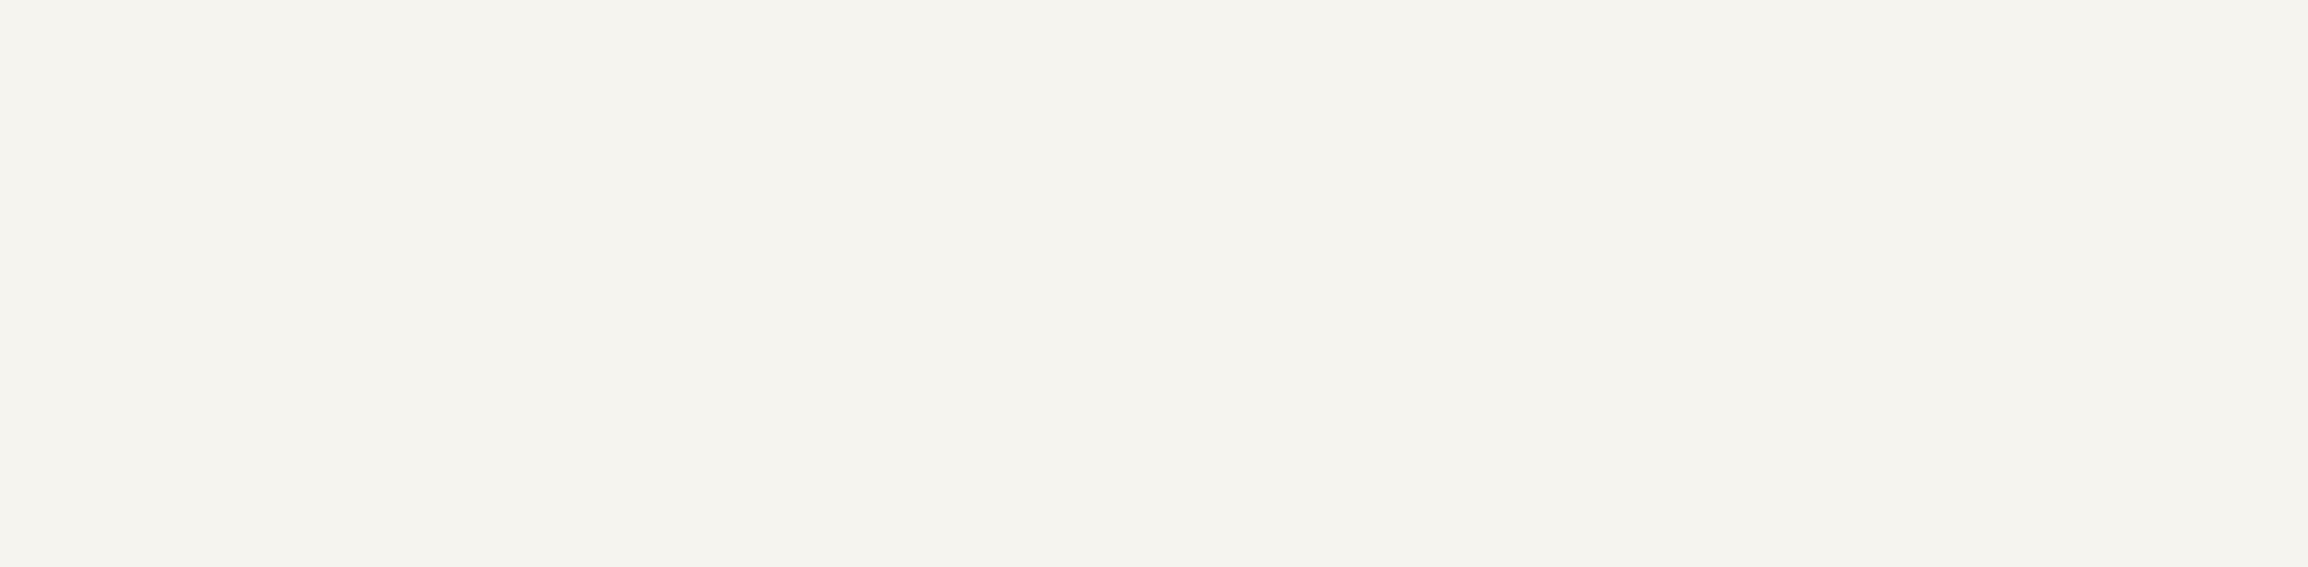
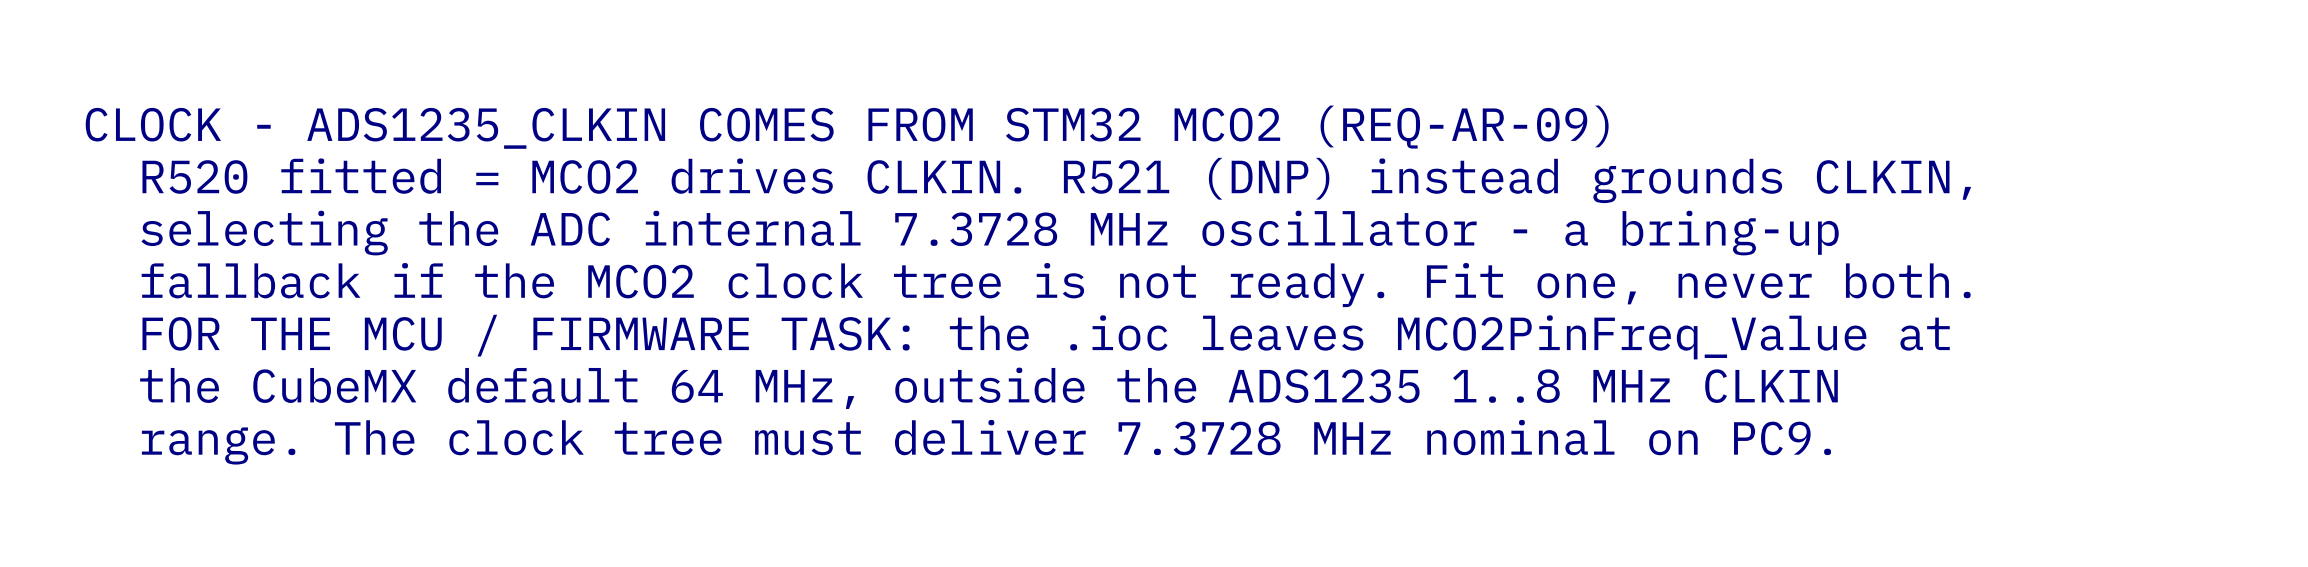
text: none -> CLOCK - ADS1235_CLKIN COMES FROM STM32 MCO2 (REQ-AR-09) (847, 127)
text: none -> R520 fitted = MCO2 drives CLKIN. R521 (DNP) instead grounds CLKIN, (1056, 180)
text: none -> selecting the ADC internal 7.3728 MHz oscillator - a bring-up (990, 233)
text: none -> fallback if the MCO2 clock tree is not ready. Fit one, never both. (1056, 285)
text: none -> FOR THE MCU / FIRMWARE TASK: the .ioc leaves MCO2PinFreq_Value at (1046, 337)
text: none -> the CubeMX default 64 MHz, outside the ADS1235 1..8 MHz CLKIN (988, 388)
text: none -> range. The clock tree must deliver 7.3728 MHz nominal on PC9. (986, 442)

